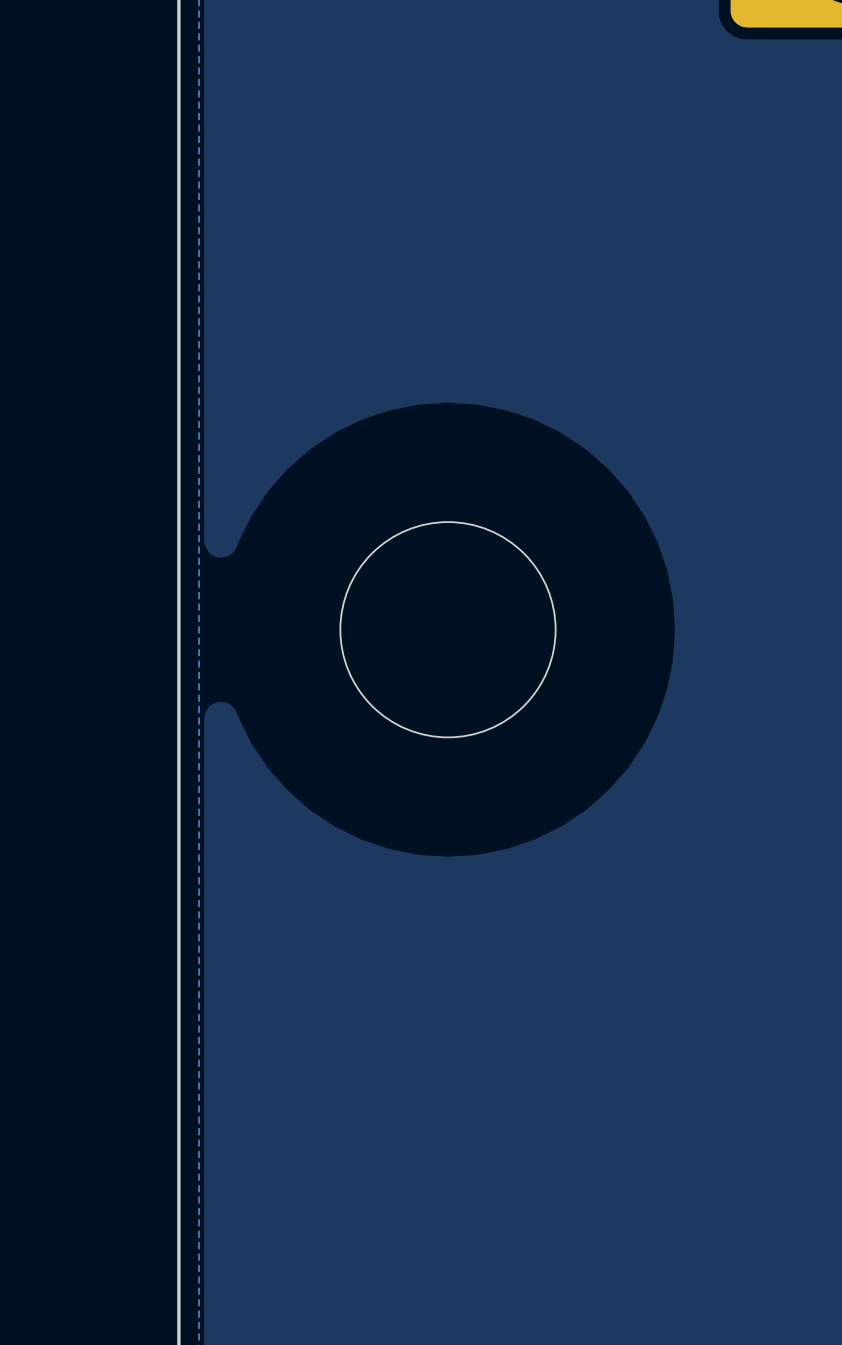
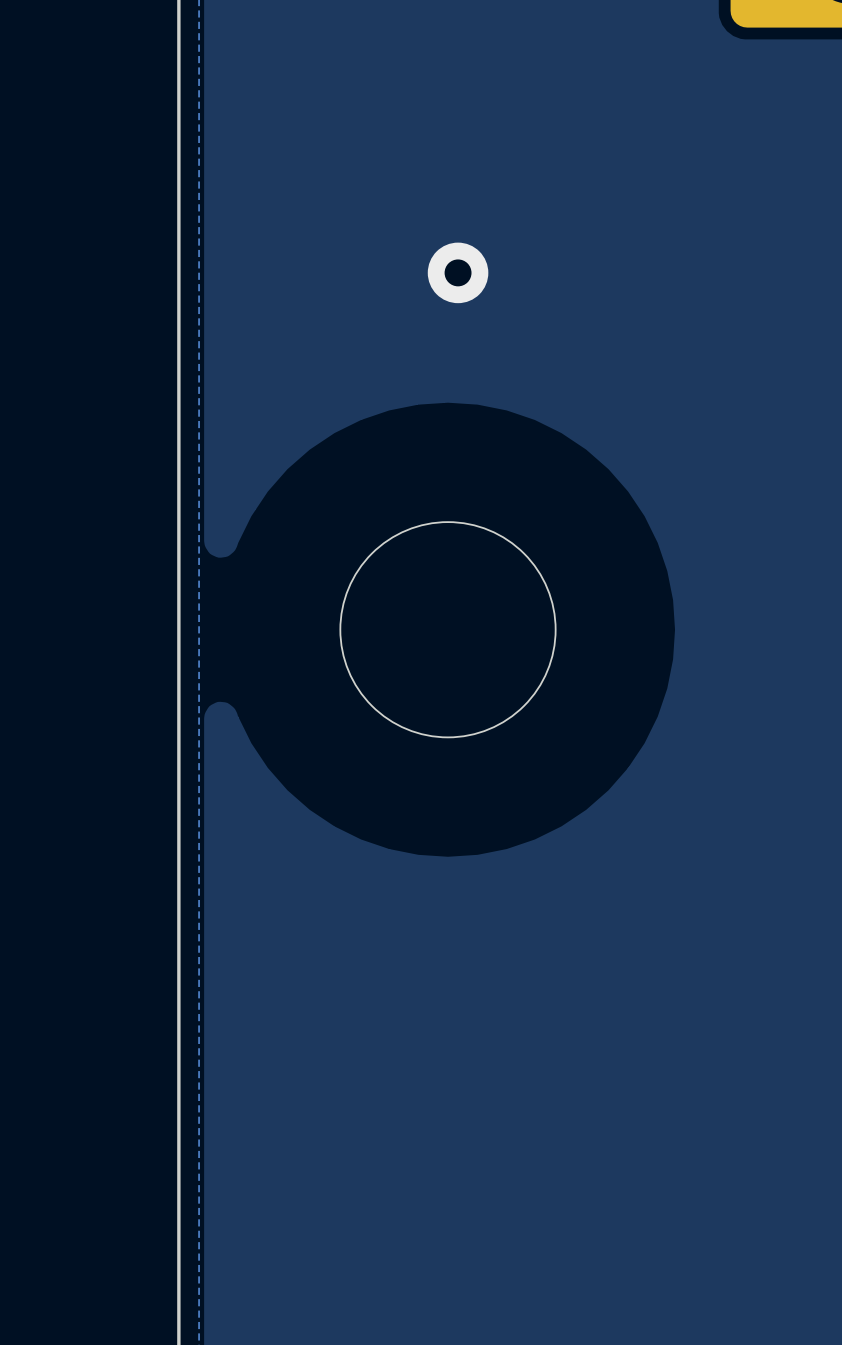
via: none -> (458, 272)

